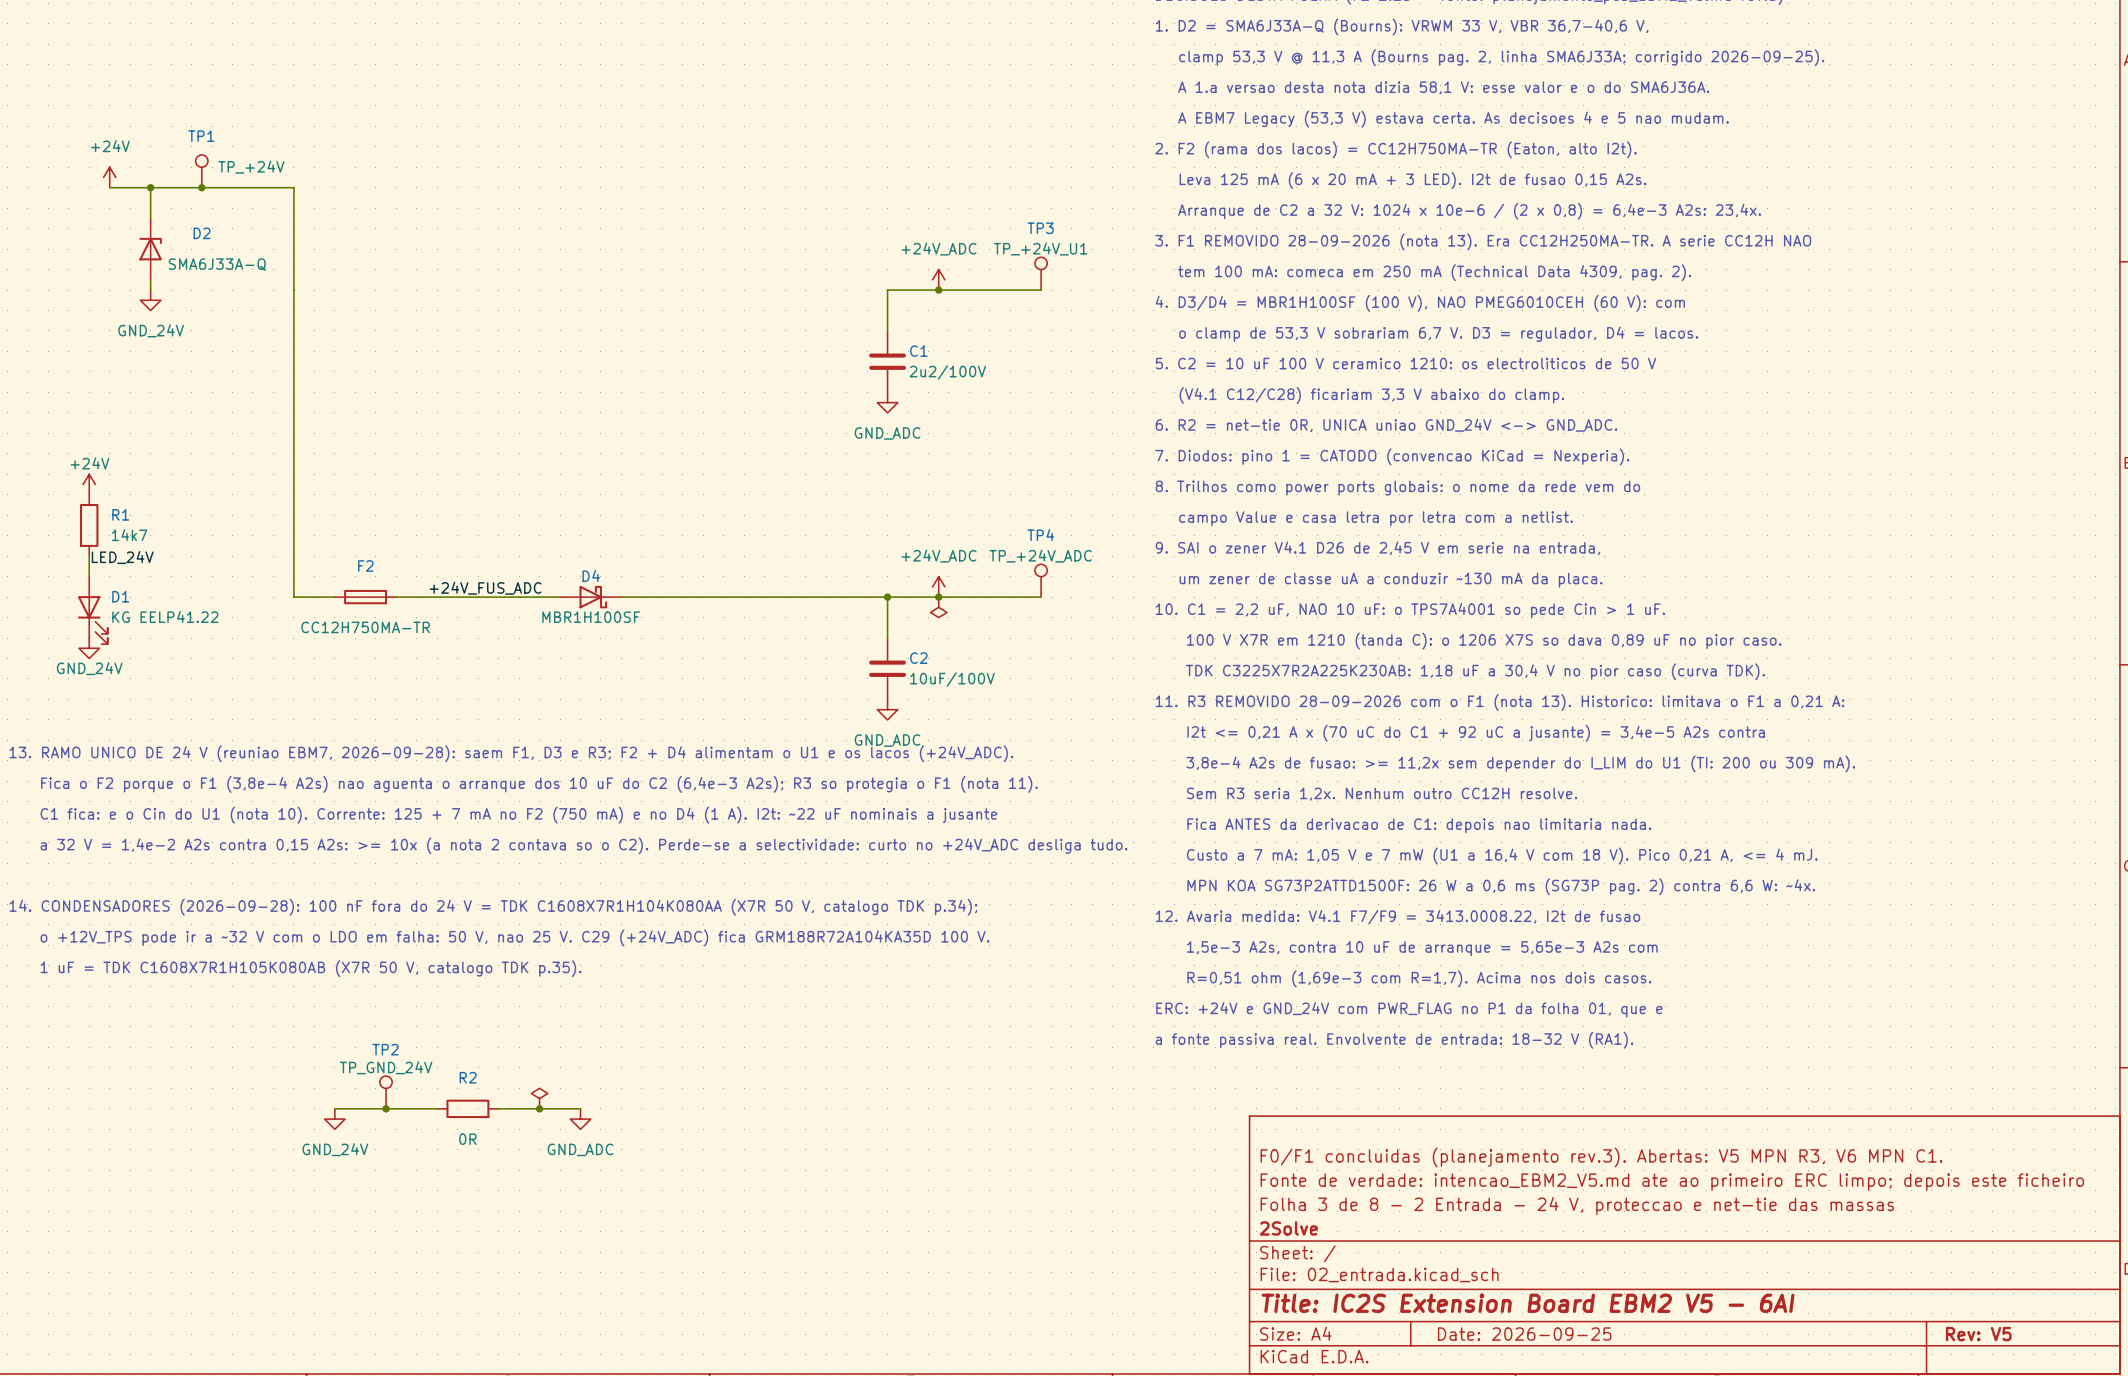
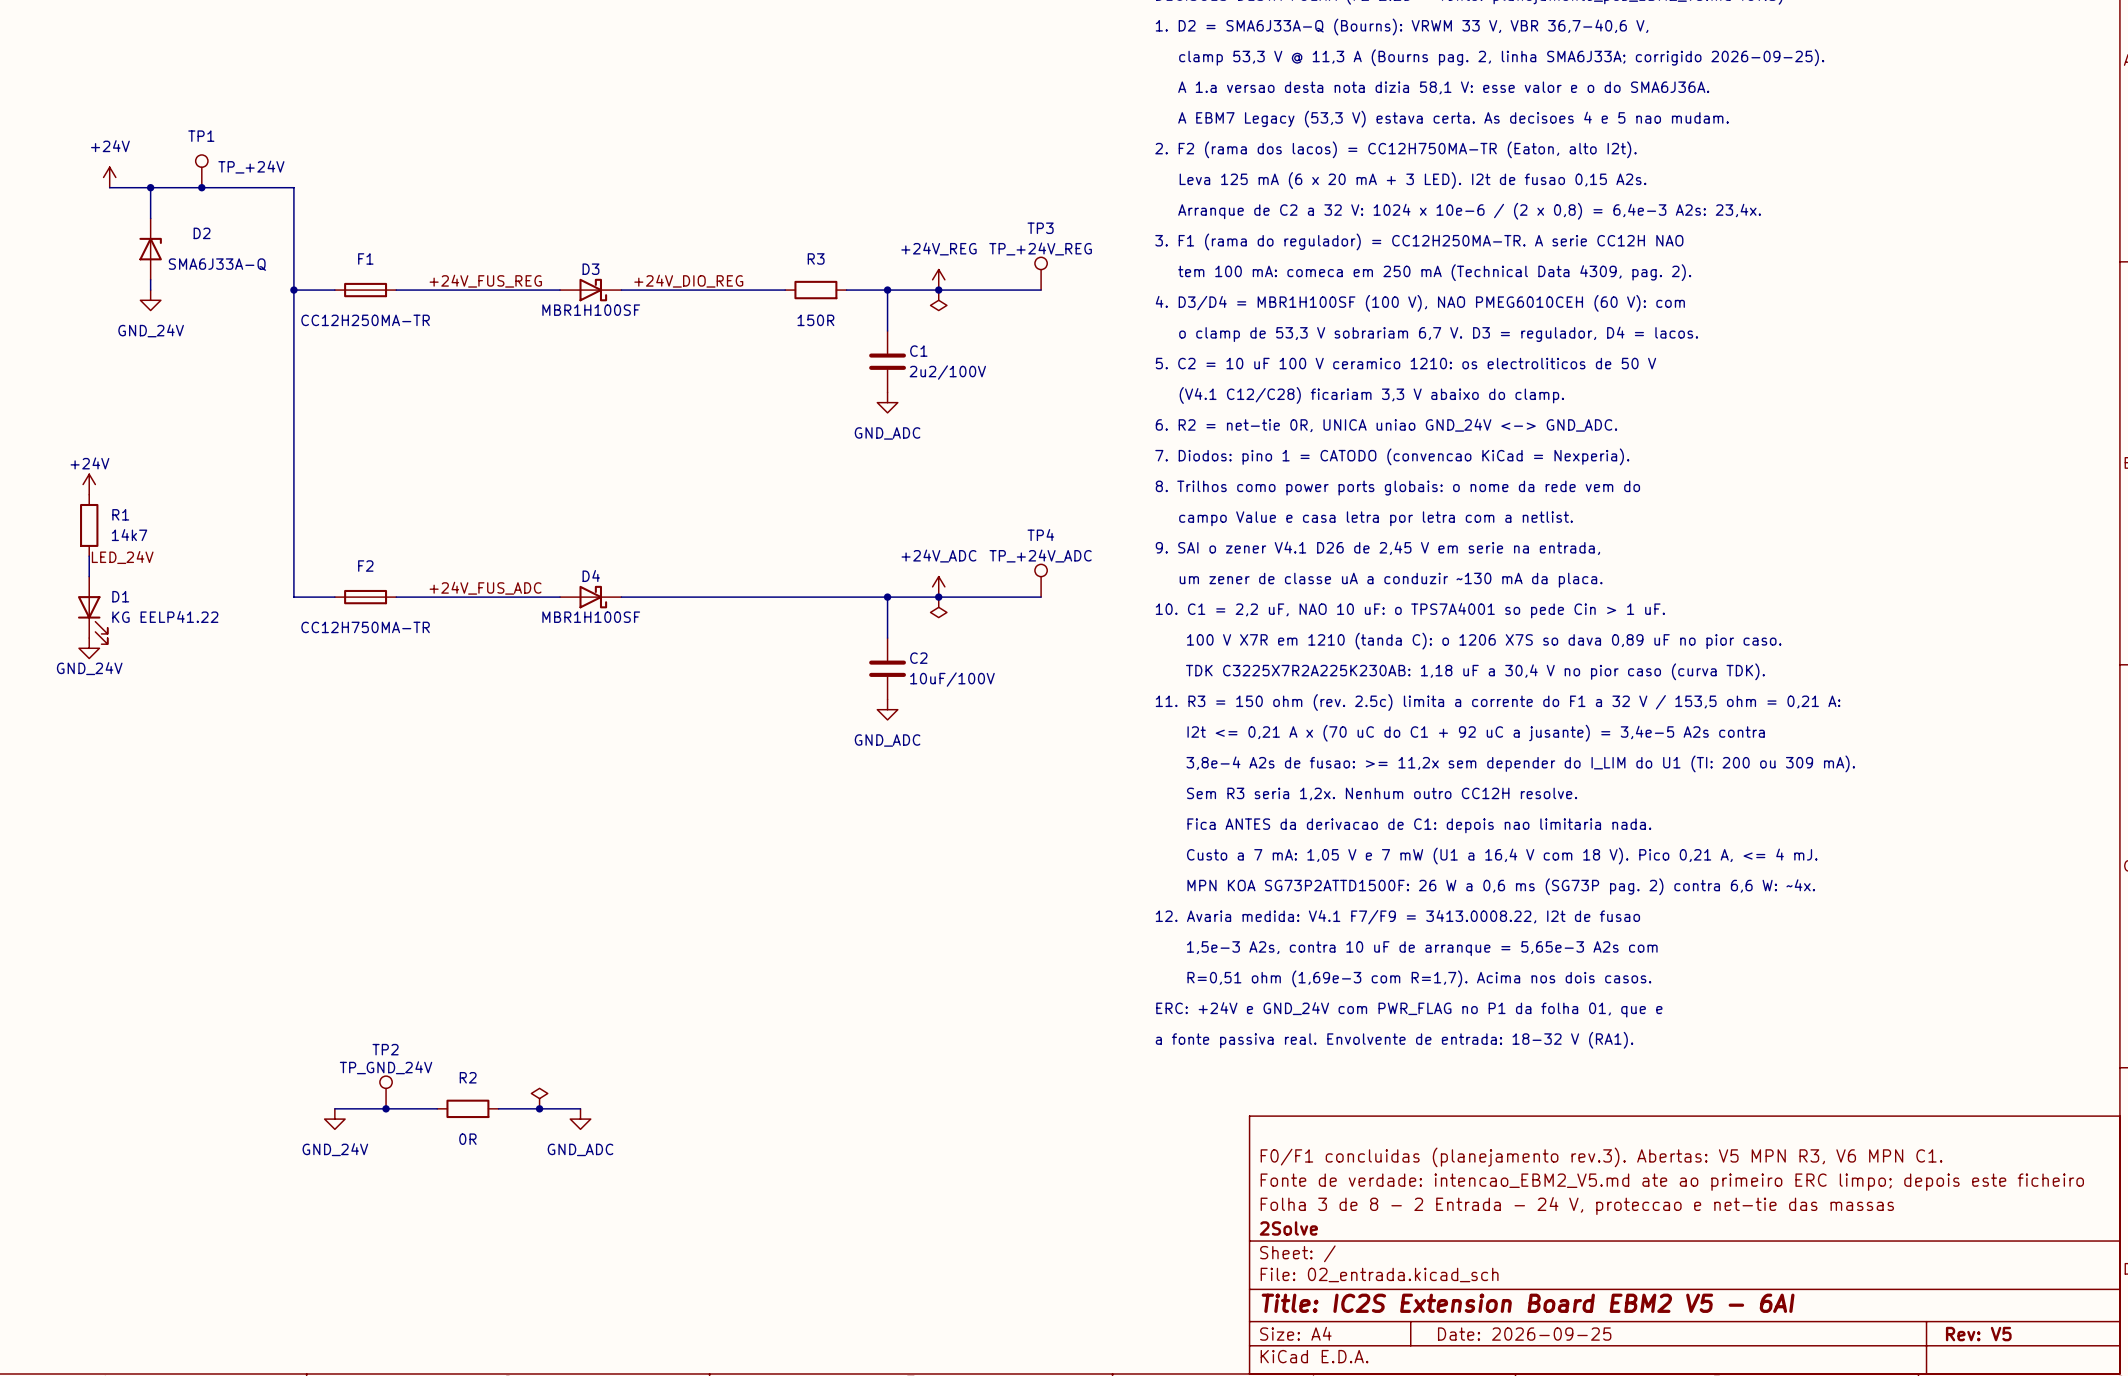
text: 3. F1 REMOVIDO 28-09-2026 (nota 13). Era CC12H250MA-TR. A serie CC12H NAO (1483, 241) -> 3. F1 (rama do regulador) = CC12H250MA-TR. A serie CC12H NAO (1419, 241)
TP3 value: TP_+24V_U1 (1040, 248) -> TP_+24V_REG (1040, 248)
power symbol: +24V_ADC (938, 279) -> +24V_REG (938, 279)
label: none -> +24V_FUS_REG (485, 281)
label: none -> +24V_DIO_REG (688, 281)
wire: none -> (293, 290) (334, 290)
junction: none -> (293, 290)
F1: none -> CC12H250MA-TR (365, 290)
wire: none -> (396, 290) (560, 290)
D3: none -> MBR1H100SF (590, 290)
wire: none -> (621, 290) (785, 290)
R3: none -> 150R (815, 290)
wire: none -> (846, 290) (887, 290)
junction: none -> (887, 290)
power symbol: none -> (938, 300)
text: 11. R3 REMOVIDO 28-09-2026 com o F1 (nota 13). Historico: limitava o F1 a 0,21 A: (1500, 702) -> 11. R3 = 150 ohm (rev. 2.5c) limita a corrente do F1 a 32 V / 153,5 ohm = 0,21 A: (1498, 702)
text: 13. RAMO UNICO DE 24 V (reuniao EBM7, 2026-09-28): saem F1, D3 e R3; F2 + D4 alimentam o U1 e os lacos (+24V_ADC). (511, 753) -> none
text: Fica o F2 porque o F1 (3,8e-4 A2s) nao aguenta o arranque dos 10 uF do C2 (6,4e-3 A2s); R3 so protegia o F1 (nota 11). (539, 784) -> none
text: C1 fica: e o Cin do U1 (nota 10). Corrente: 125 + 7 mA no F2 (750 mA) e no D4 (1 A). I2t: ~22 uF nominais a jusante (518, 815) -> none
text: a 32 V = 1,4e-2 A2s contra 0,15 A2s: >= 10x (a nota 2 contava so o C2). Perde-se a selectividade: curto no +24V_ADC desliga tudo. (583, 845) -> none
text: 14. CONDENSADORES (2026-09-28): 100 nF fora do 24 V = TDK C1608X7R1H104K080AA (X7R 50 V, catalogo TDK p.34); (493, 907) -> none
text: o +12V_TPS pode ir a ~32 V com o LDO em falha: 50 V, nao 25 V. C29 (+24V_ADC) fica GRM188R72A104KA35D 100 V. (515, 937) -> none
text: 1 uF = TDK C1608X7R1H105K080AB (X7R 50 V, catalogo TDK p.35). (311, 968) -> none

